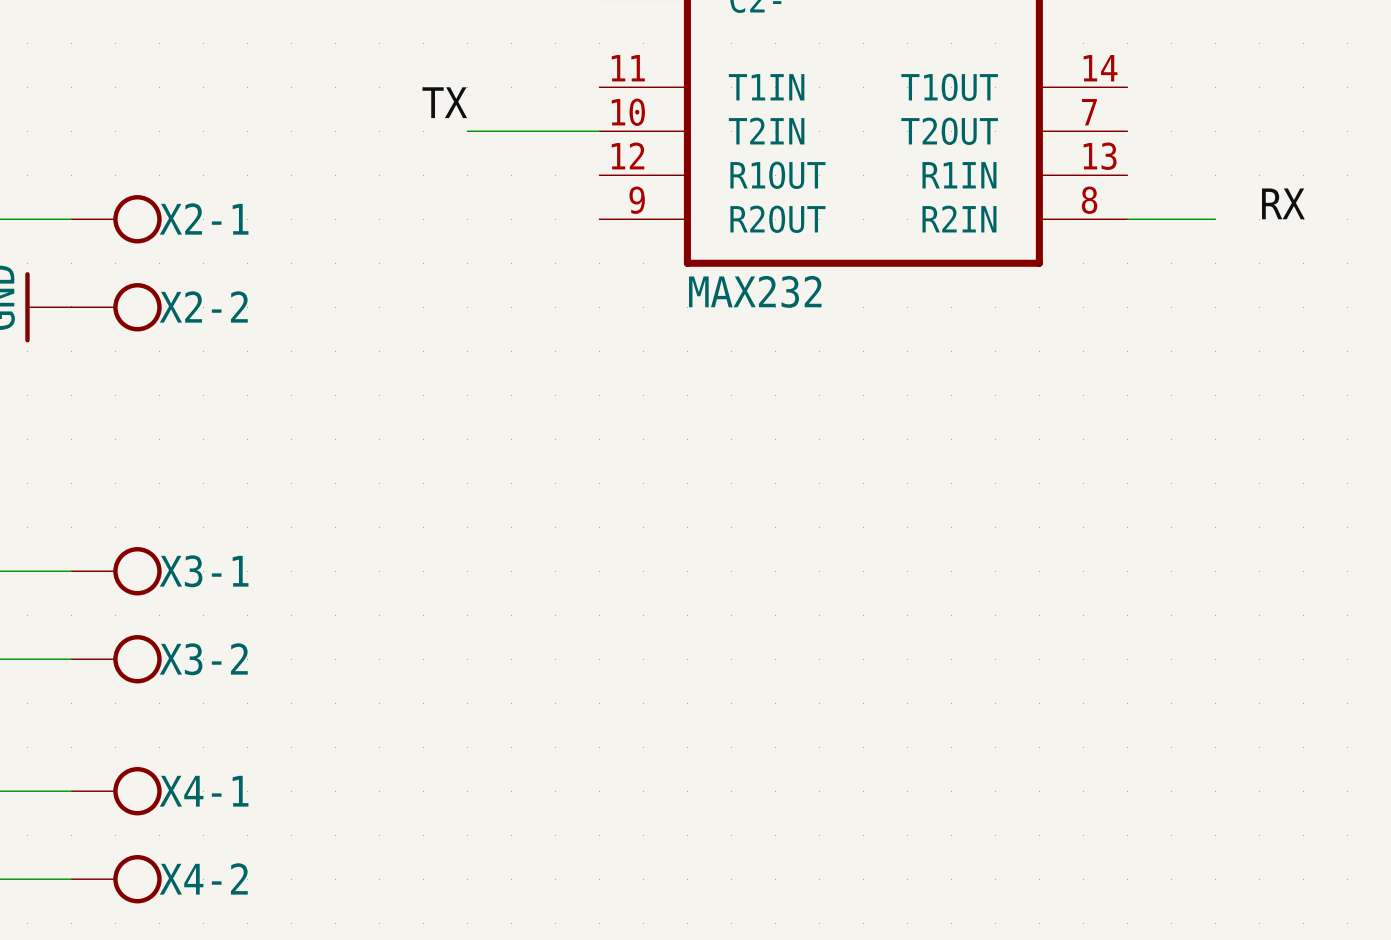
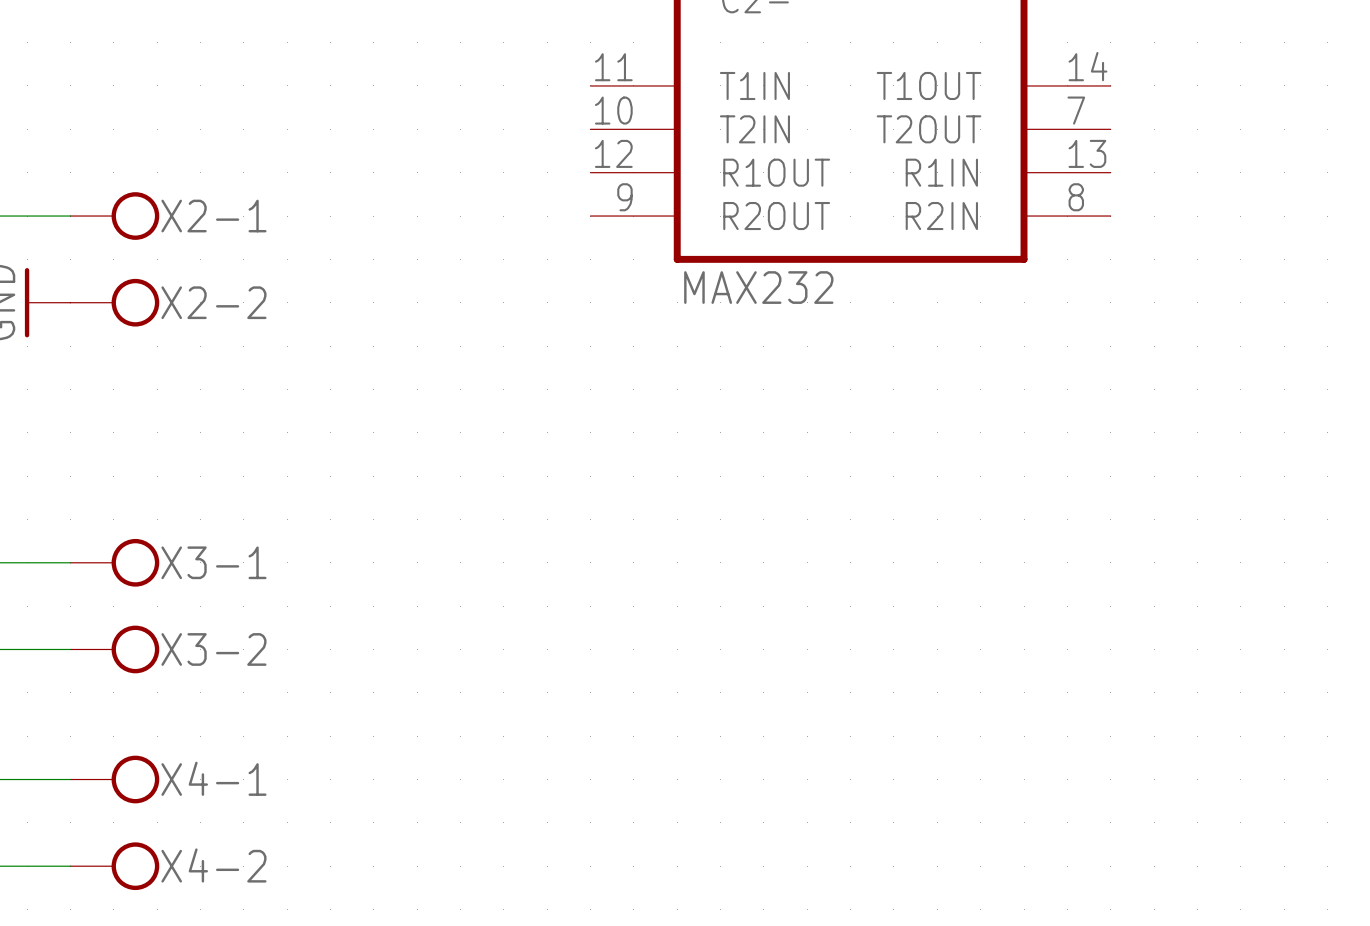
label: TX (444, 102) -> none
wire: (467, 131) (599, 131) -> none
label: RX (1283, 203) -> none
wire: (1127, 219) (1215, 219) -> none

